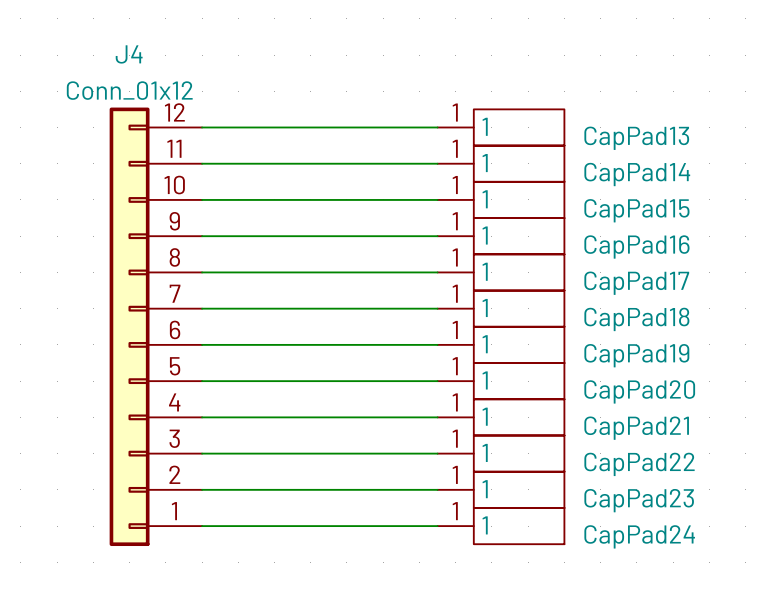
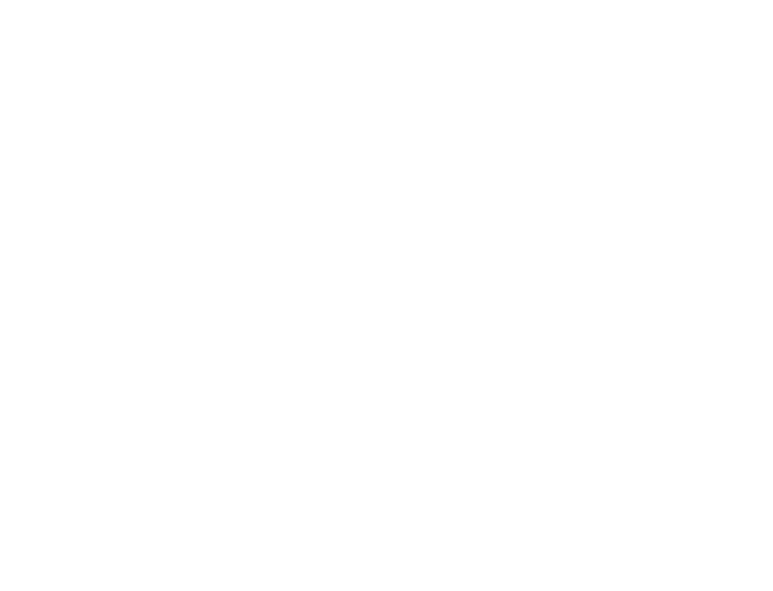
wire: (202, 127) (437, 127) -> none
CapPad13: (500, 127) -> none
wire: (202, 163) (437, 163) -> none
CapPad14: (500, 163) -> none
wire: (202, 199) (437, 199) -> none
CapPad15: (500, 199) -> none
wire: (202, 236) (437, 236) -> none
CapPad16: (500, 236) -> none
wire: (202, 272) (437, 272) -> none
CapPad17: (500, 272) -> none
wire: (202, 308) (437, 308) -> none
CapPad18: (500, 308) -> none
J4: Conn_01x12 (155, 326) -> none
wire: (202, 344) (437, 344) -> none
CapPad19: (500, 344) -> none
wire: (202, 381) (437, 381) -> none
CapPad20: (500, 381) -> none
wire: (202, 417) (437, 417) -> none
CapPad21: (500, 417) -> none
wire: (202, 453) (437, 453) -> none
CapPad22: (500, 453) -> none
wire: (202, 489) (437, 489) -> none
CapPad23: (500, 489) -> none
wire: (202, 526) (437, 526) -> none
CapPad24: (500, 526) -> none

